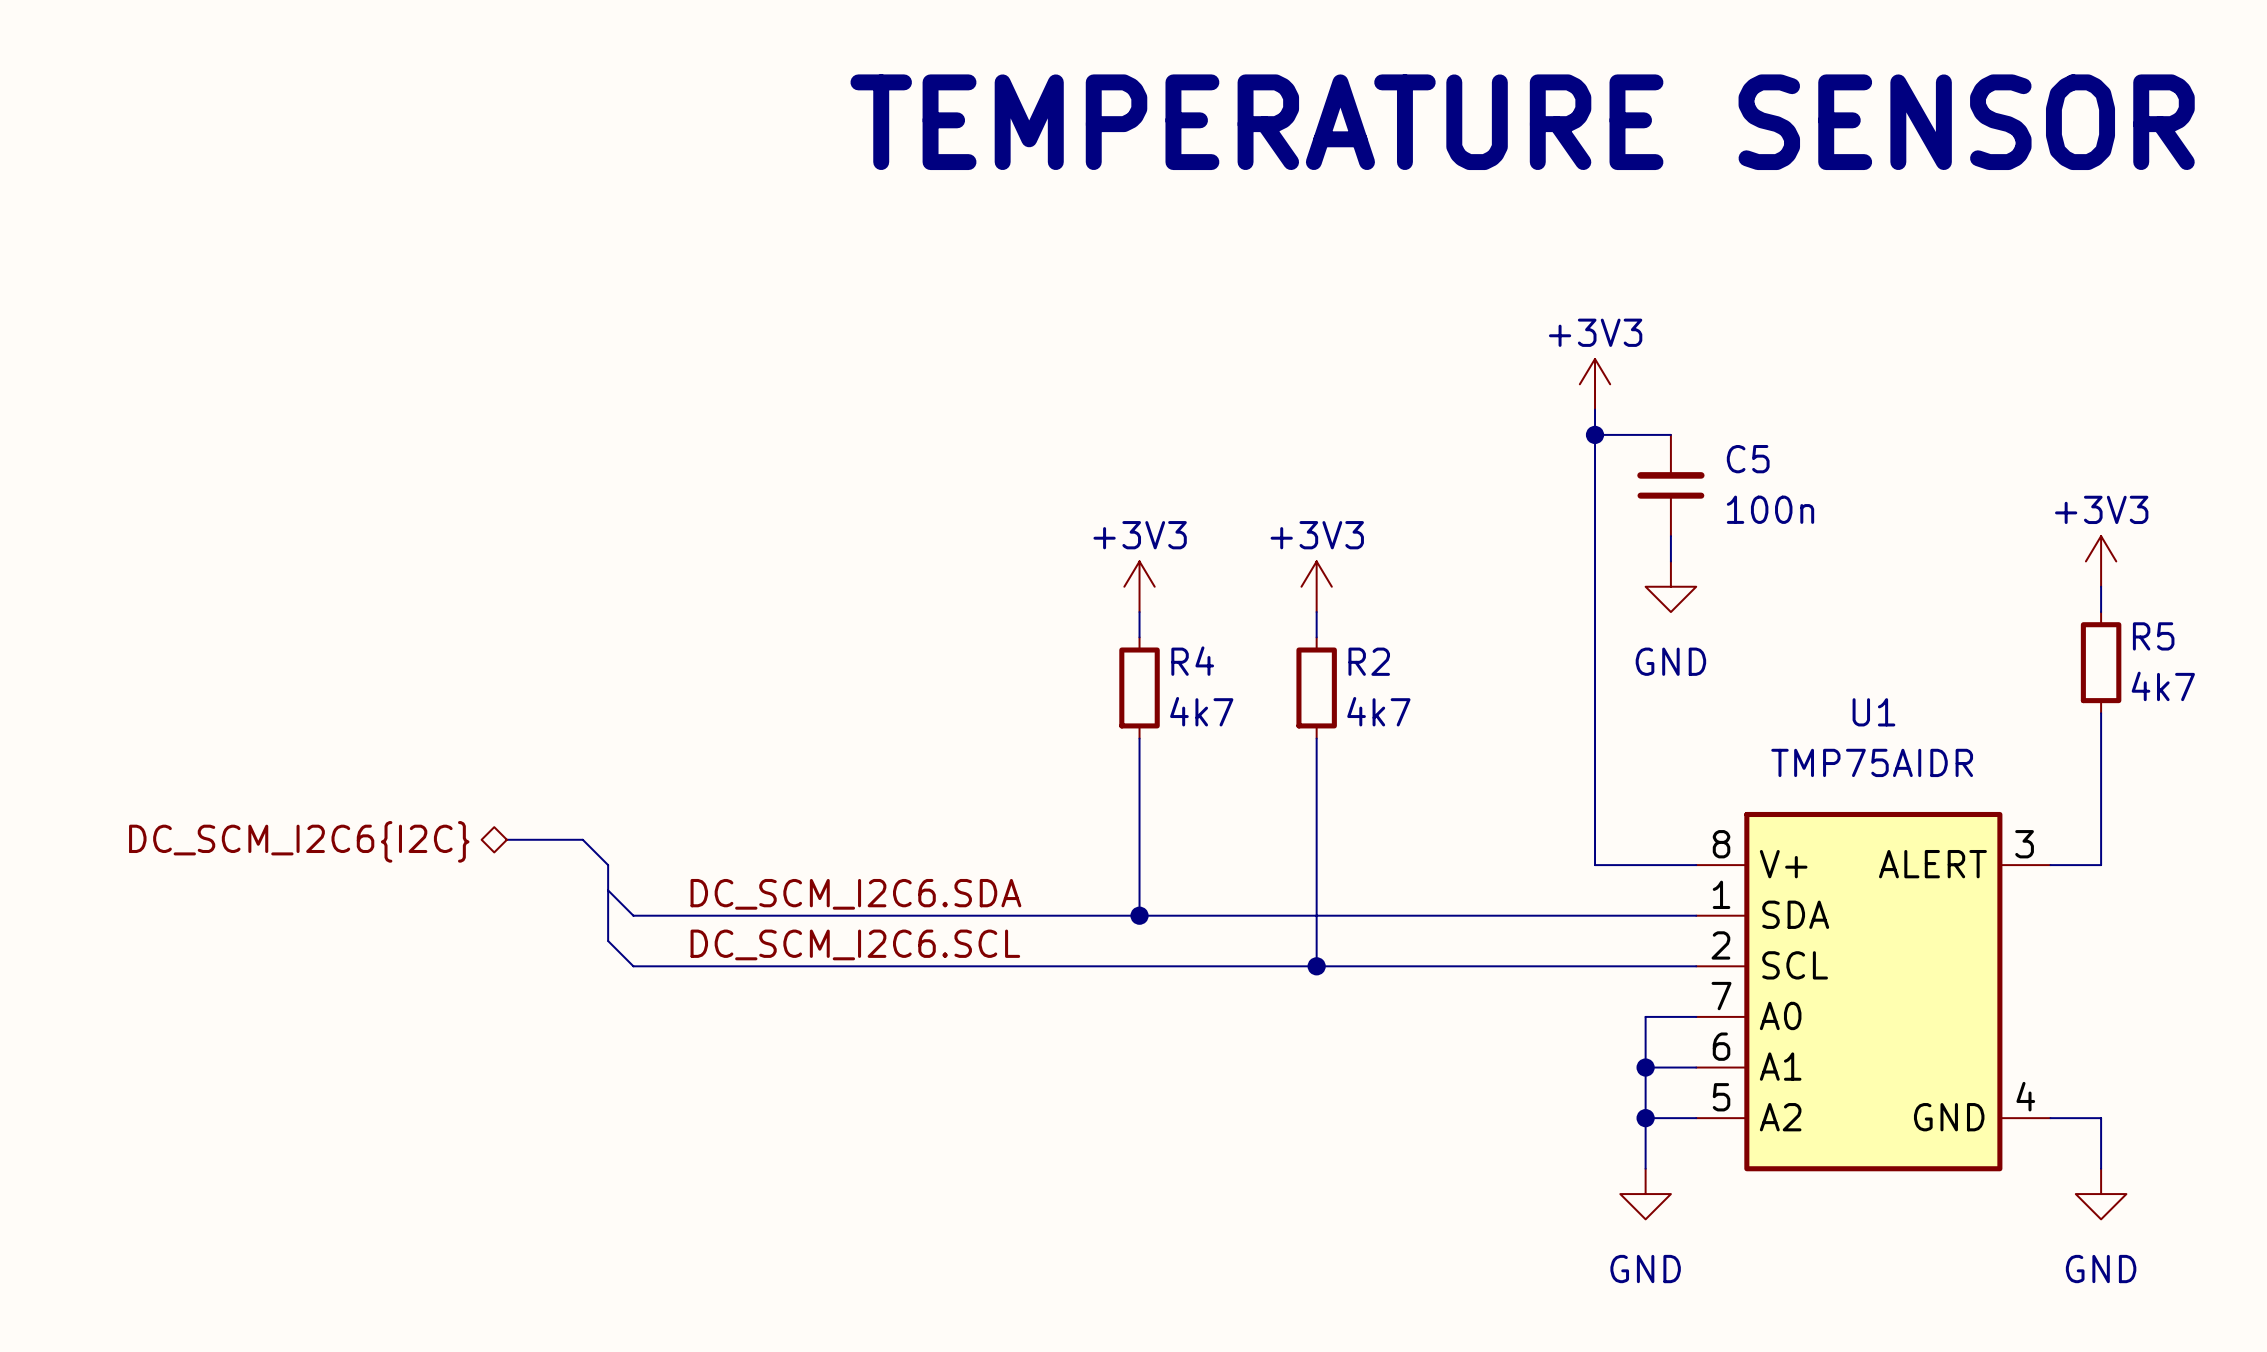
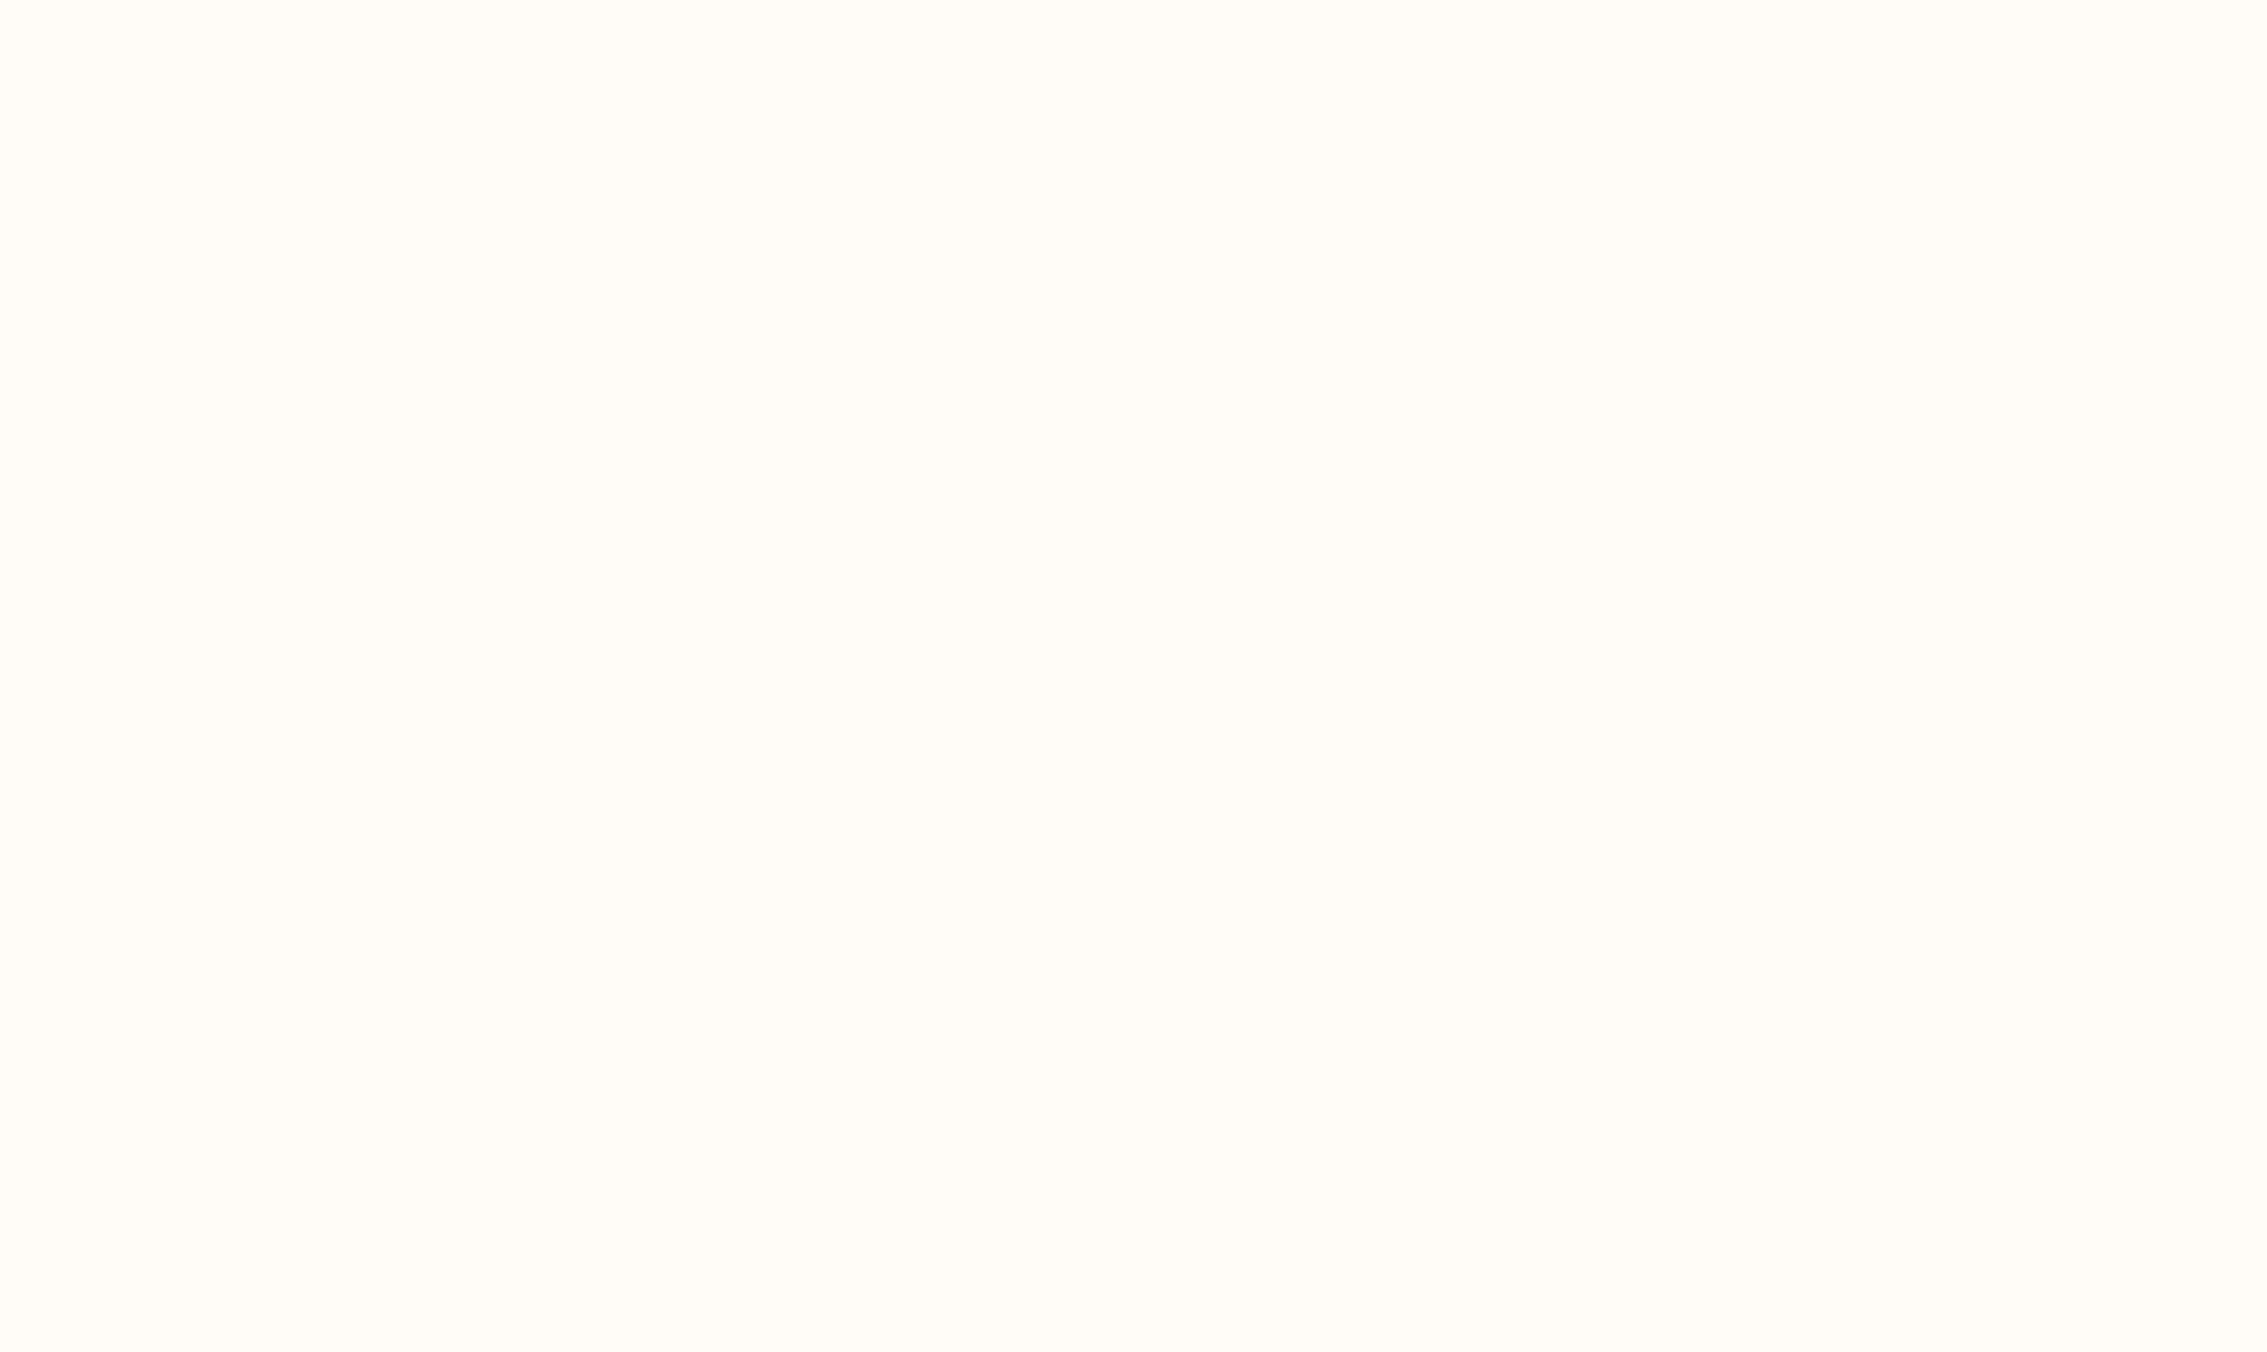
text: TEMPERATURE SENSOR (1522, 122) -> none
power symbol: +3V3 (1595, 384) -> none
wire: (1595, 409) (1595, 865) (1696, 865) -> none
wire: (1595, 434) (1670, 434) -> none
junction: (1595, 434) -> none
C5: (1670, 485) -> none
wire: (1670, 536) (1670, 561) -> none
power symbol: +3V3 (2101, 561) -> none
power symbol: +3V3 (1139, 586) -> none
power symbol: +3V3 (1316, 586) -> none
power symbol: GND (1670, 586) -> none
wire: (2101, 586) (2101, 612) -> none
wire: (1139, 612) (1139, 637) -> none
wire: (1316, 612) (1316, 637) -> none
R5: (2101, 662) -> none
R4: (1139, 687) -> none
R2: (1316, 687) -> none
wire: (2101, 713) (2101, 865) (2050, 865) -> none
wire: (1139, 738) (1139, 915) -> none
wire: (1316, 738) (1316, 966) -> none
bus: (506, 839) (582, 839) (608, 865) (608, 941) -> none
hierarchical label: DC_SCM_I2C6{I2C} (299, 841) -> none
wire: (608, 890) (633, 915) (1696, 915) -> none
label: DC_SCM_I2C6.SDA (855, 894) -> none
junction: (1139, 915) -> none
wire: (608, 941) (633, 966) (1696, 966) -> none
label: DC_SCM_I2C6.SCL (855, 944) -> none
junction: (1316, 966) -> none
U1: (1873, 991) -> none
wire: (1696, 1016) (1645, 1016) (1645, 1168) -> none
wire: (1645, 1067) (1696, 1067) -> none
junction: (1645, 1067) -> none
wire: (1645, 1118) (1696, 1118) -> none
junction: (1645, 1118) -> none
wire: (2050, 1118) (2101, 1118) (2101, 1168) -> none
power symbol: GND (1645, 1194) -> none
power symbol: GND (2101, 1194) -> none

